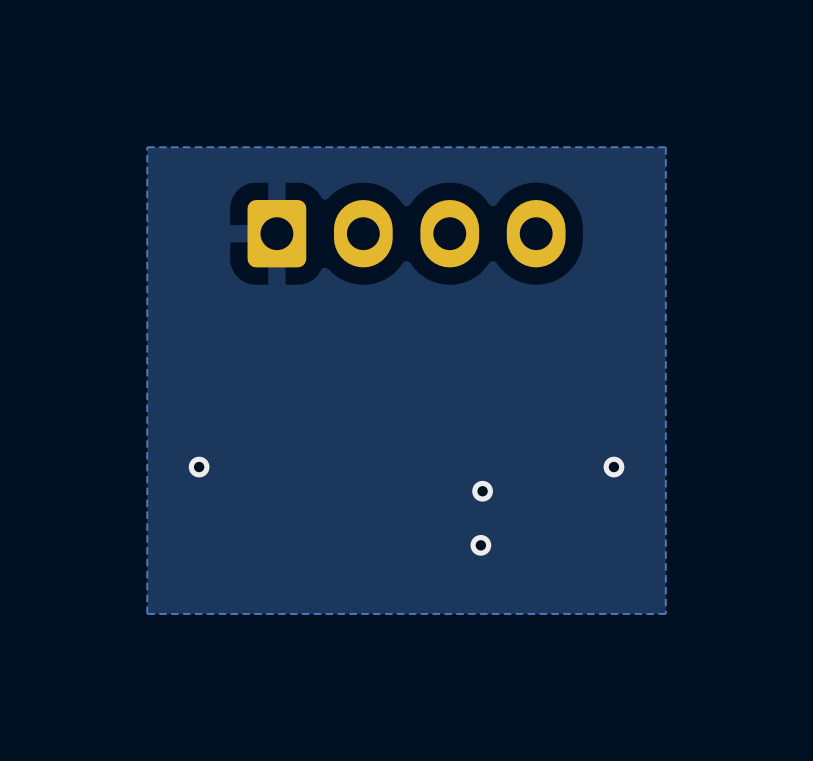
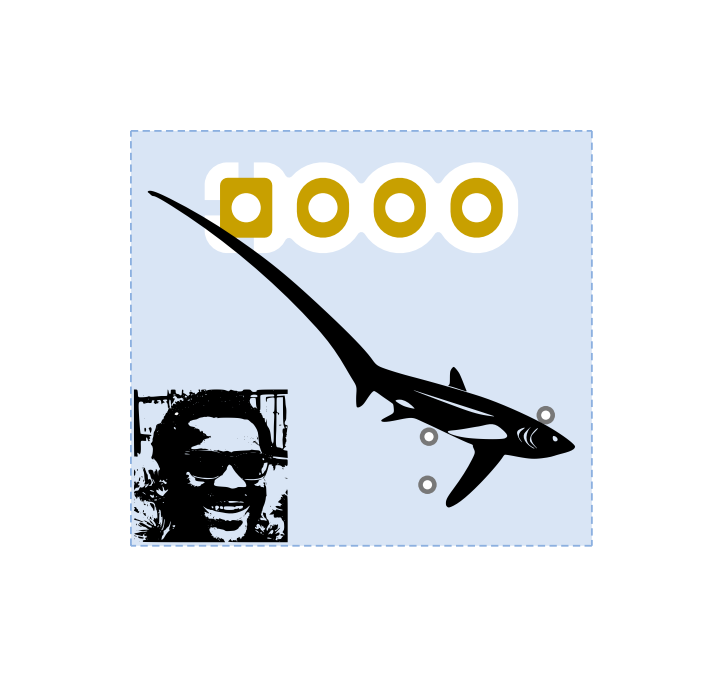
drawing: none -> [133, 190, 576, 543]

